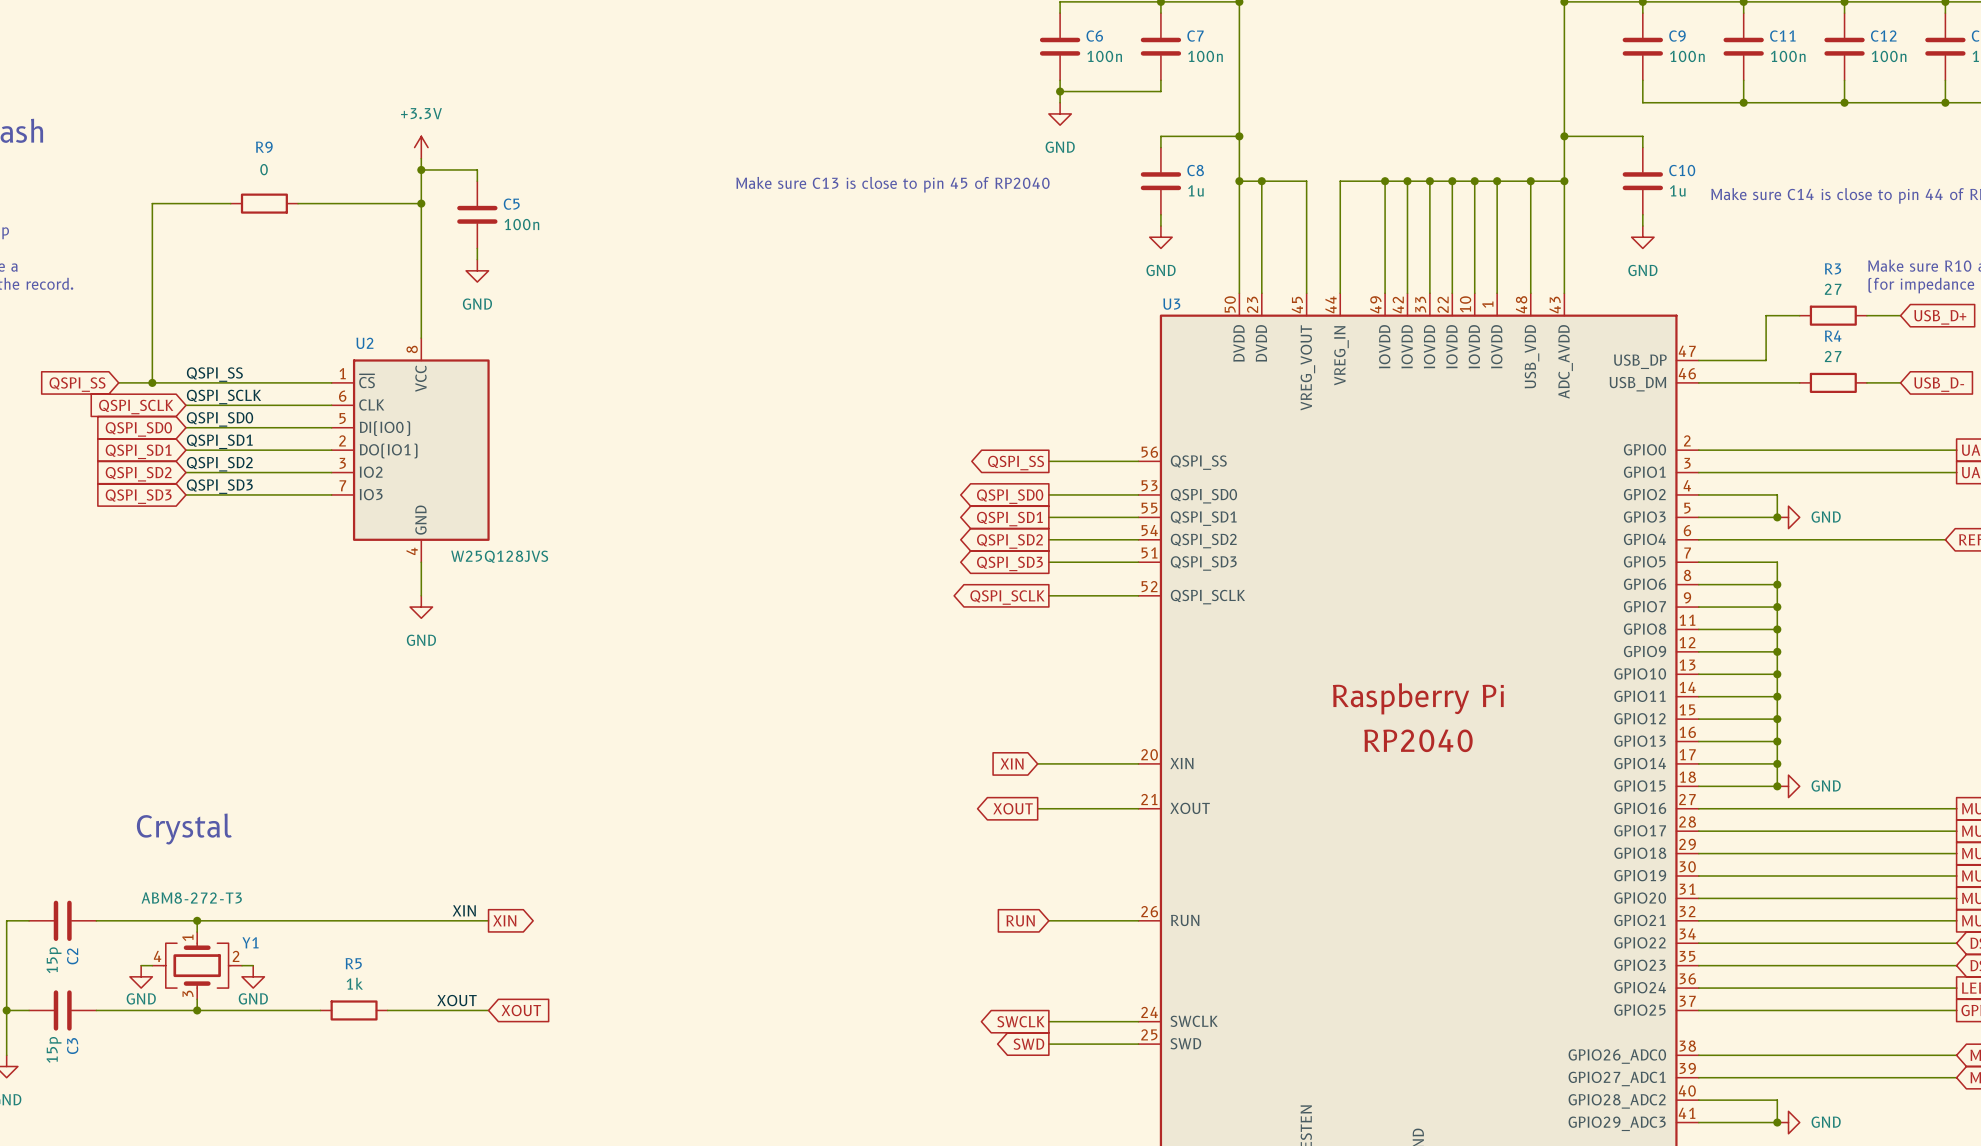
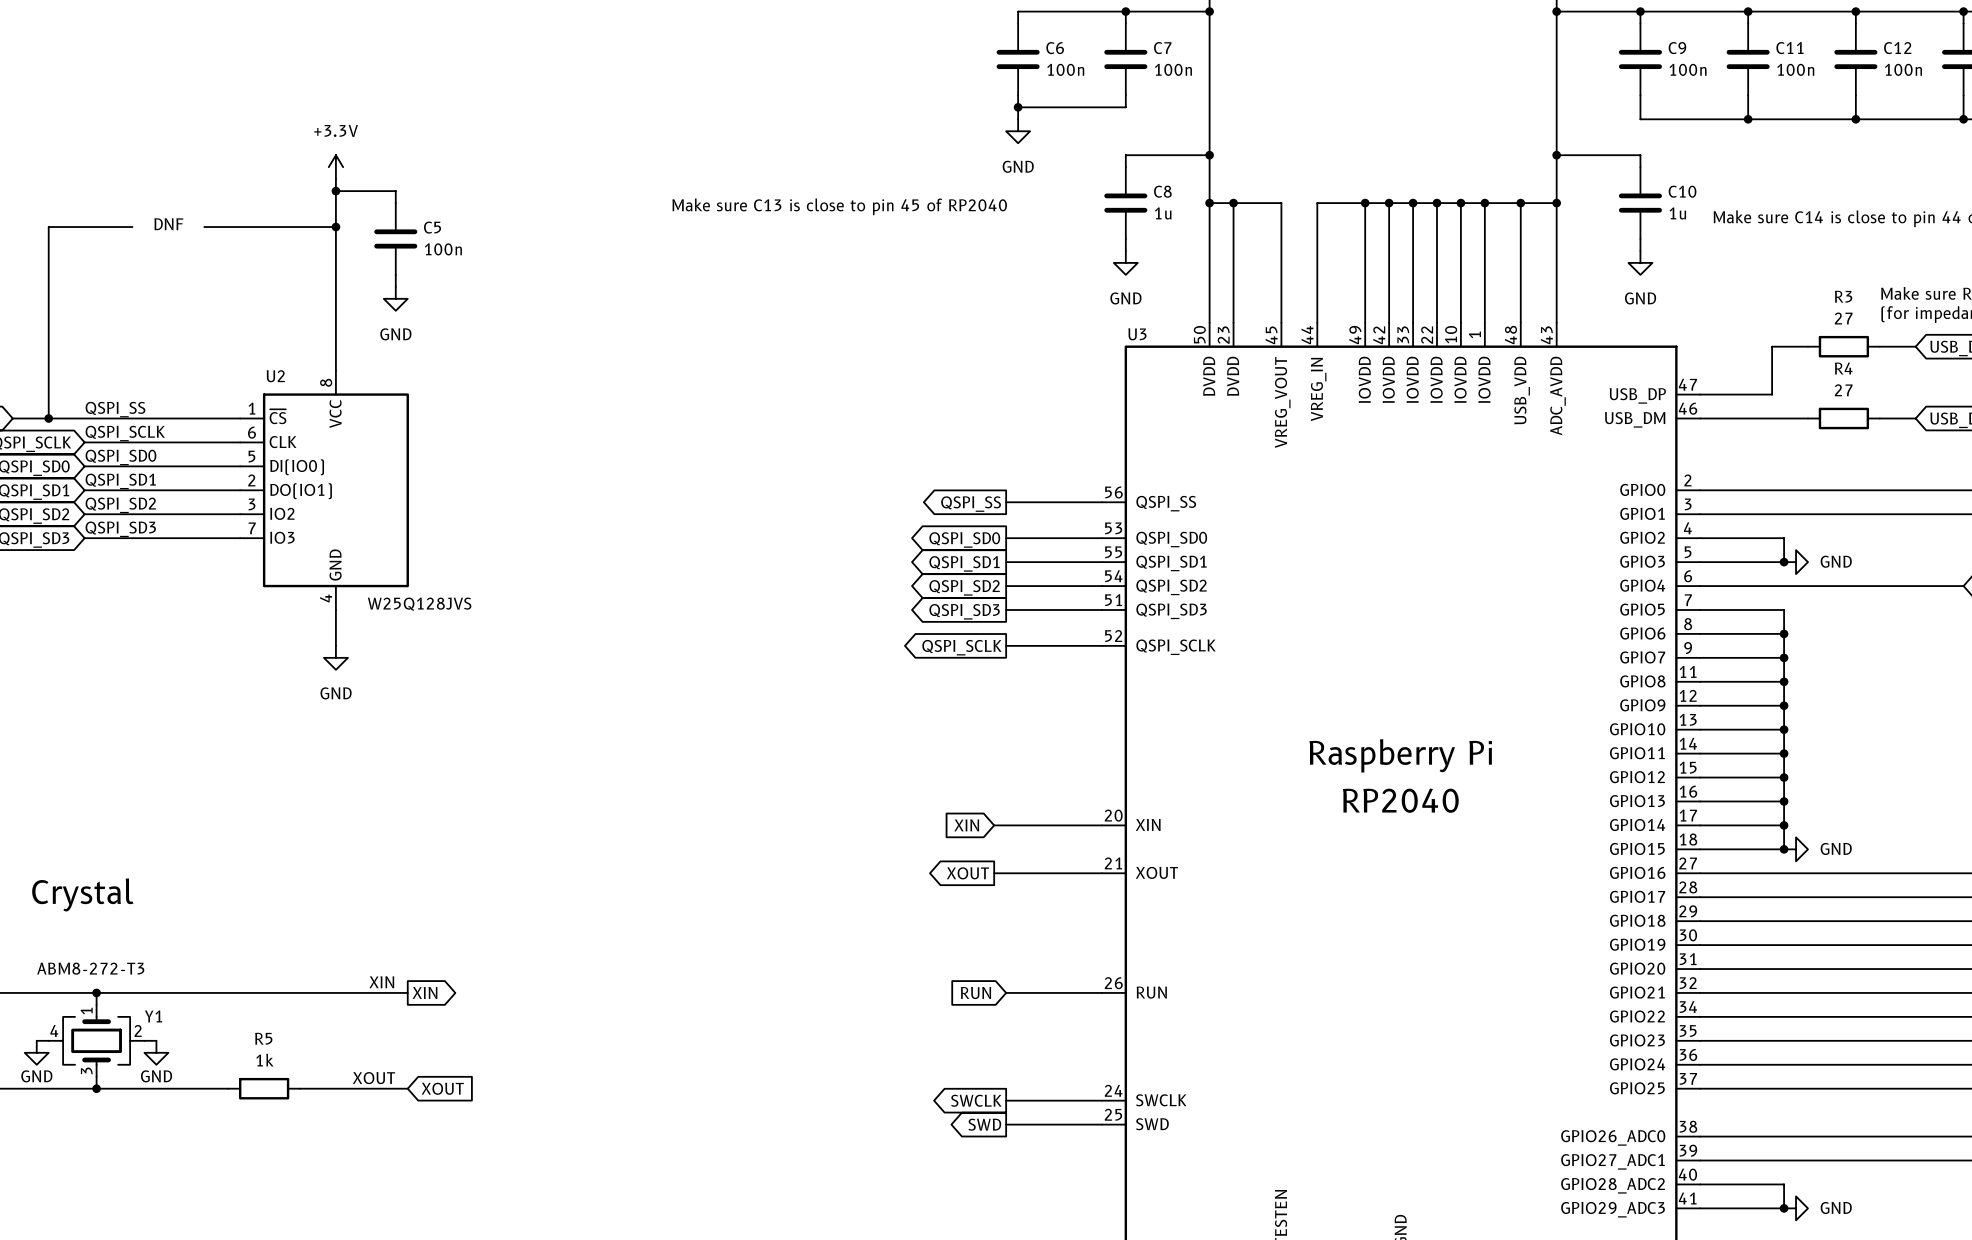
text: none -> DNF (168, 224)
R9: 0 (264, 203) -> none

